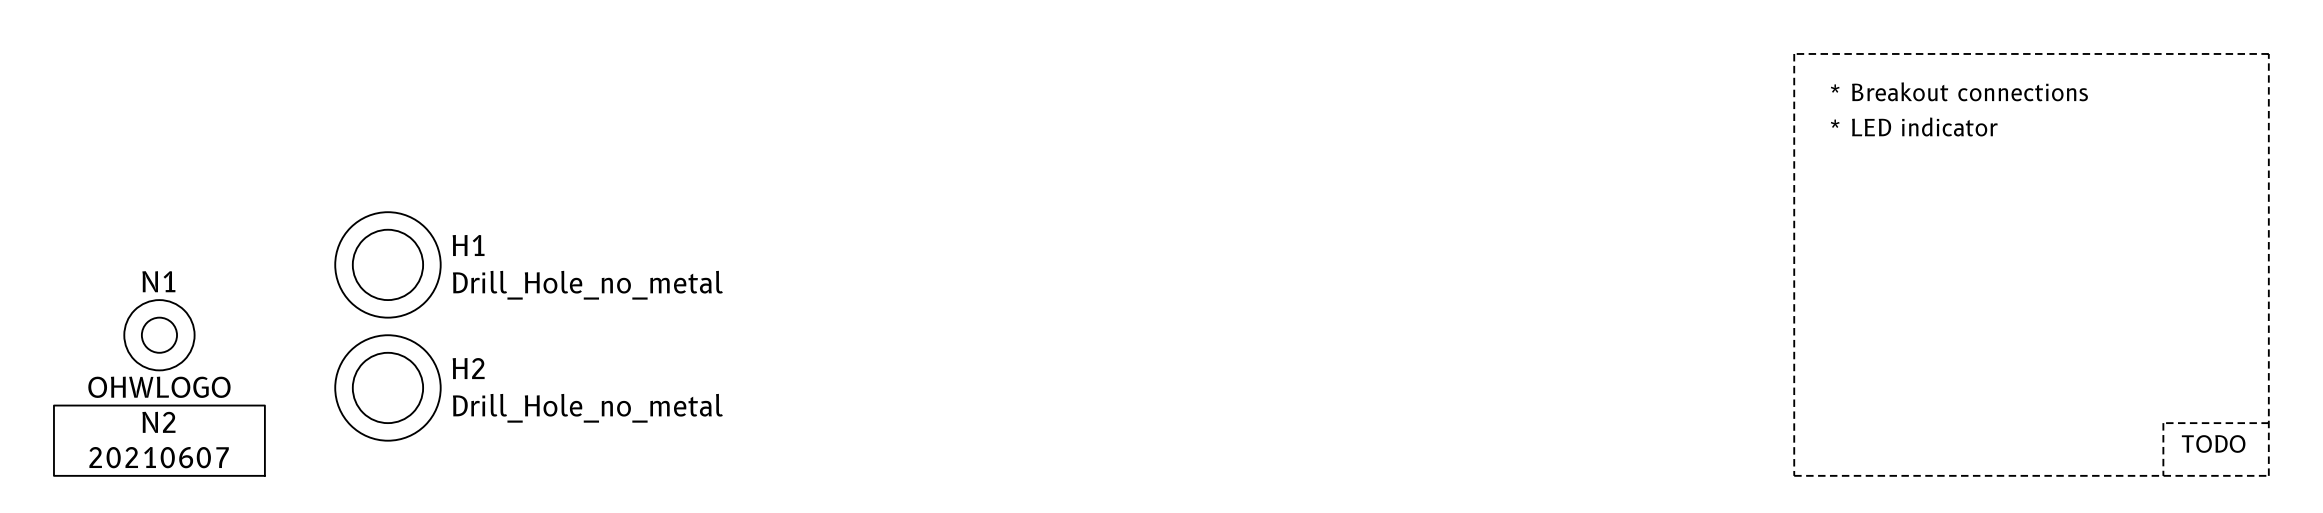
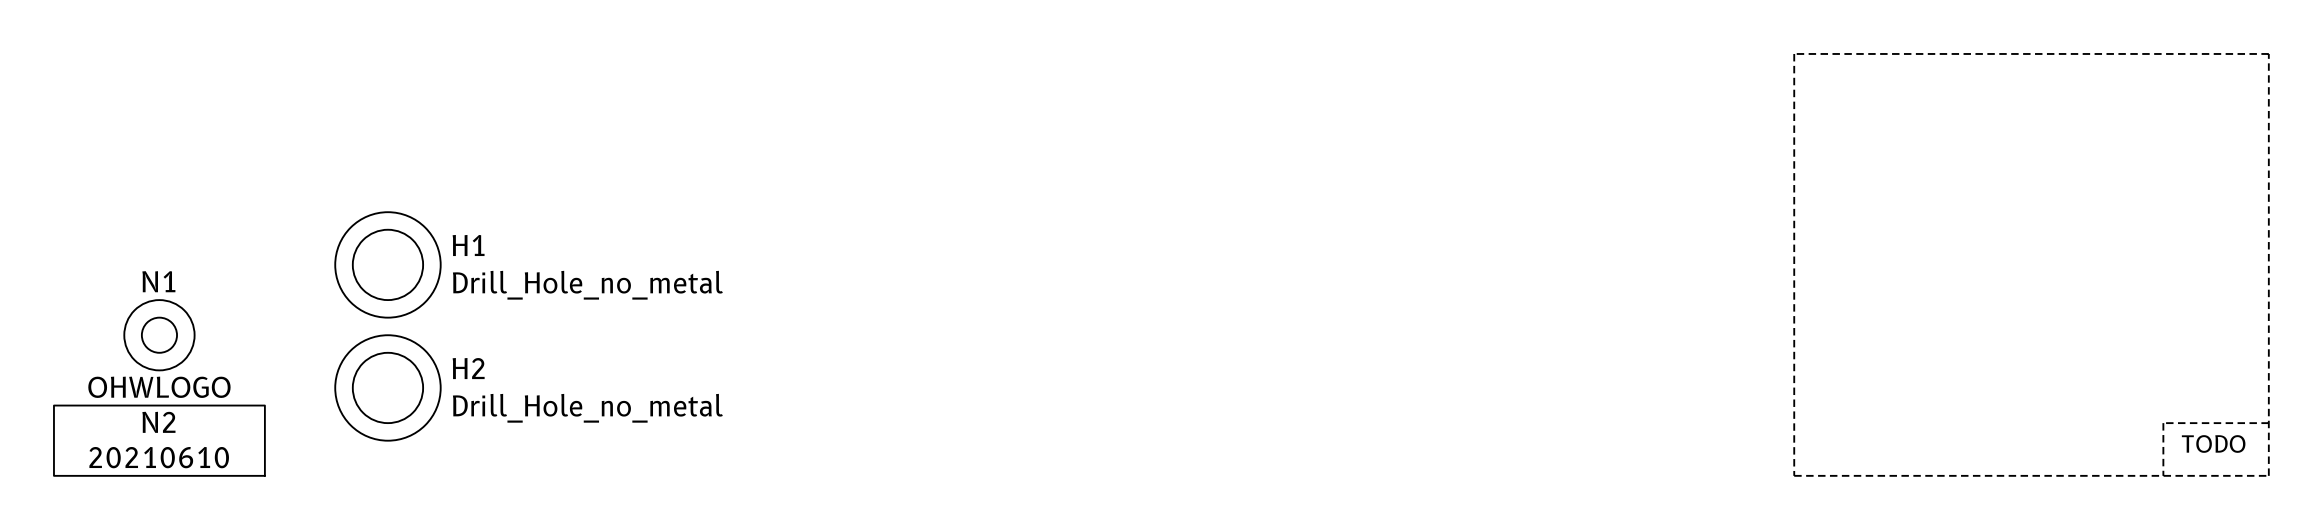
text: * Breakout connections (1959, 91) -> none
text: * LED indicator (1914, 126) -> none
N2 value: 20210607 (159, 457) -> 20210610 (159, 457)

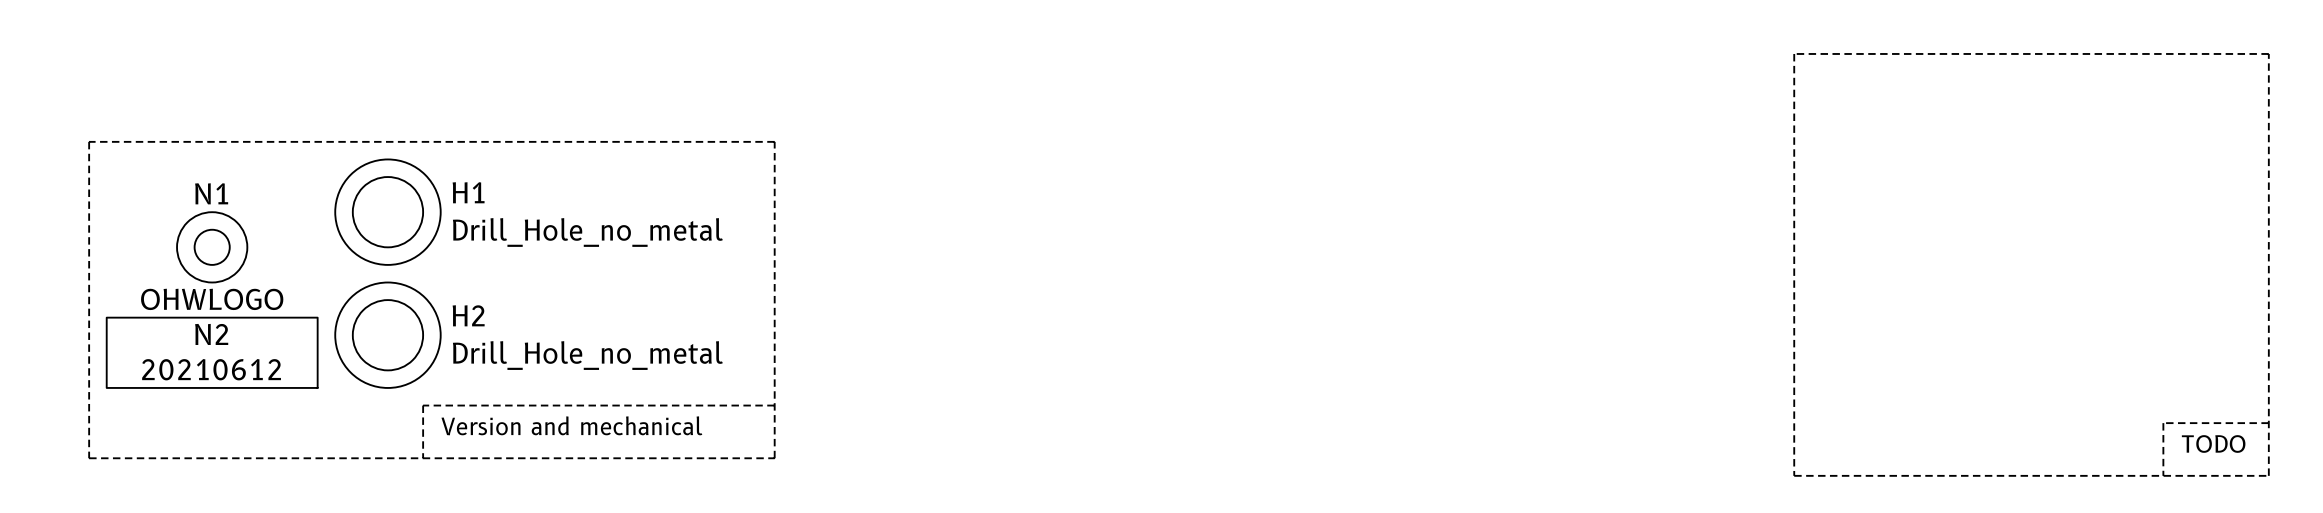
line: none -> (89, 141) (774, 141) (774, 458) (89, 458) (89, 141)
H1 position: (387, 264) -> (387, 212)
N1 position: (159, 335) -> (212, 247)
H2 position: (387, 387) -> (387, 335)
line: none -> (774, 405) (423, 405) (423, 458)
text: none -> Version and mechanical (571, 425)
N2 position: (159, 440) -> (212, 352)
N2 value: 20210610 (159, 457) -> 20210612 (211, 369)

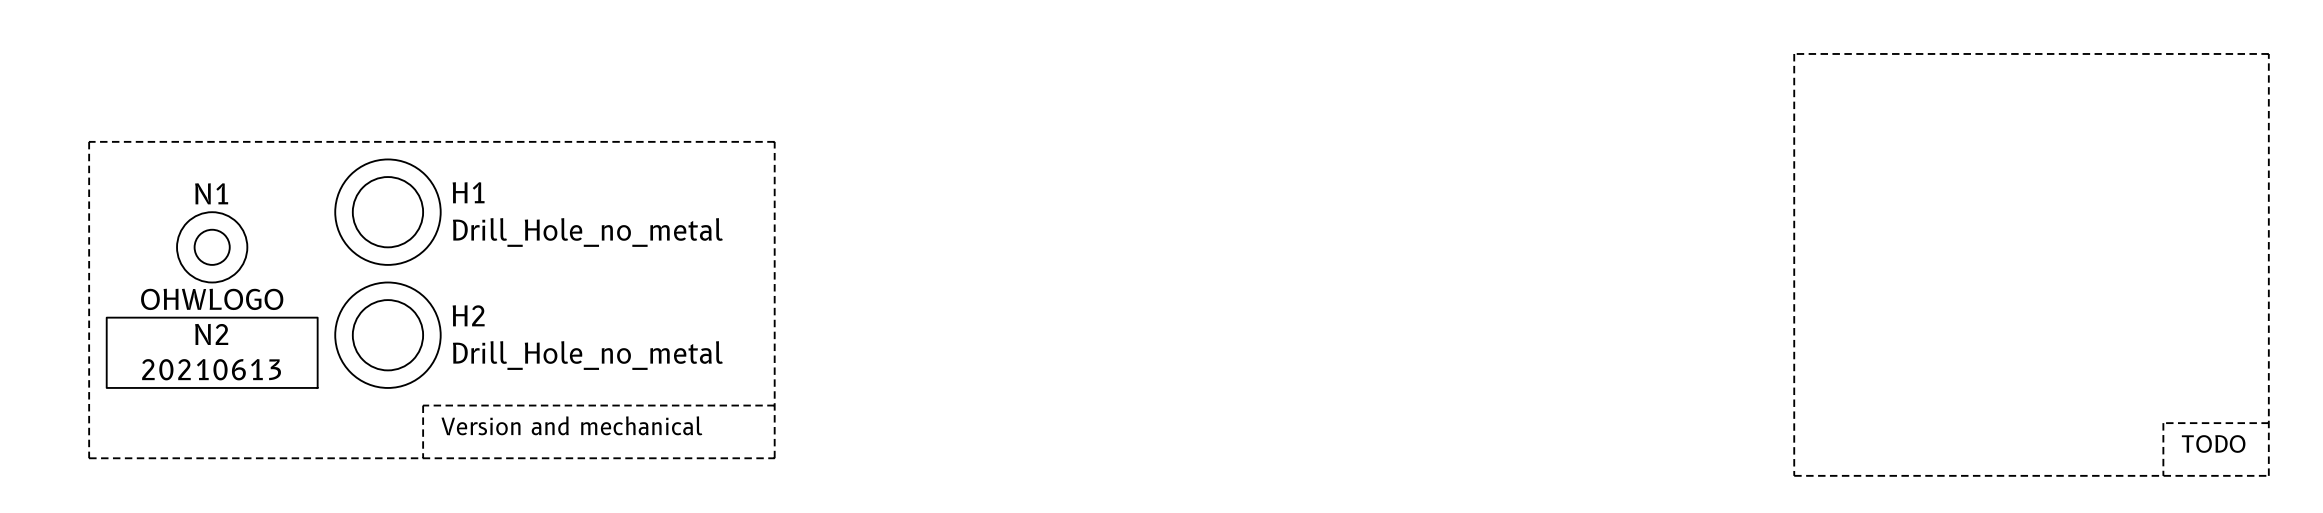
N2 value: 20210612 (211, 369) -> 20210613 (211, 369)

